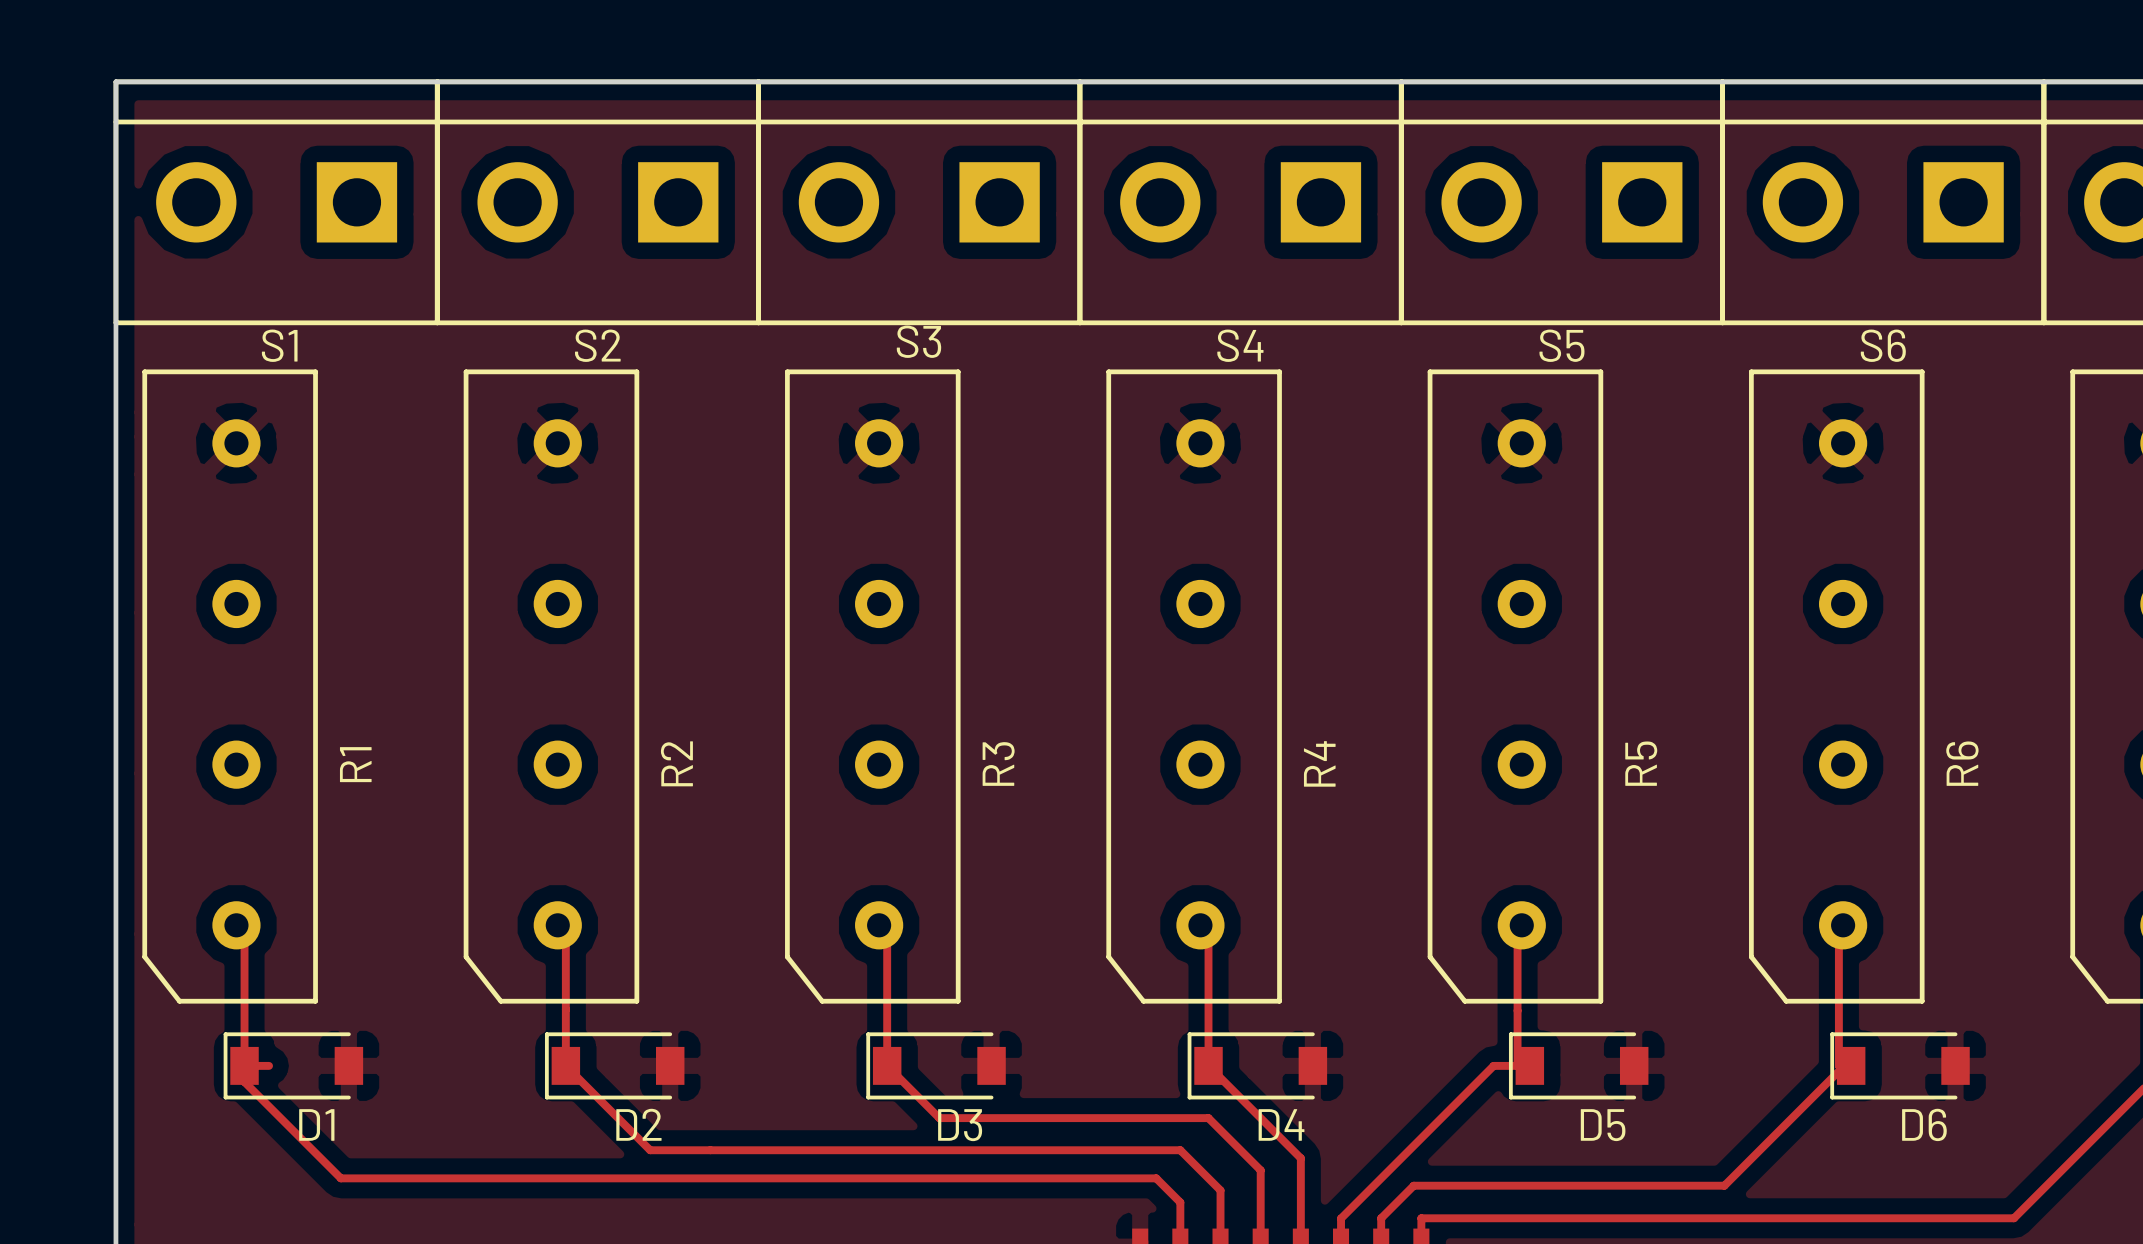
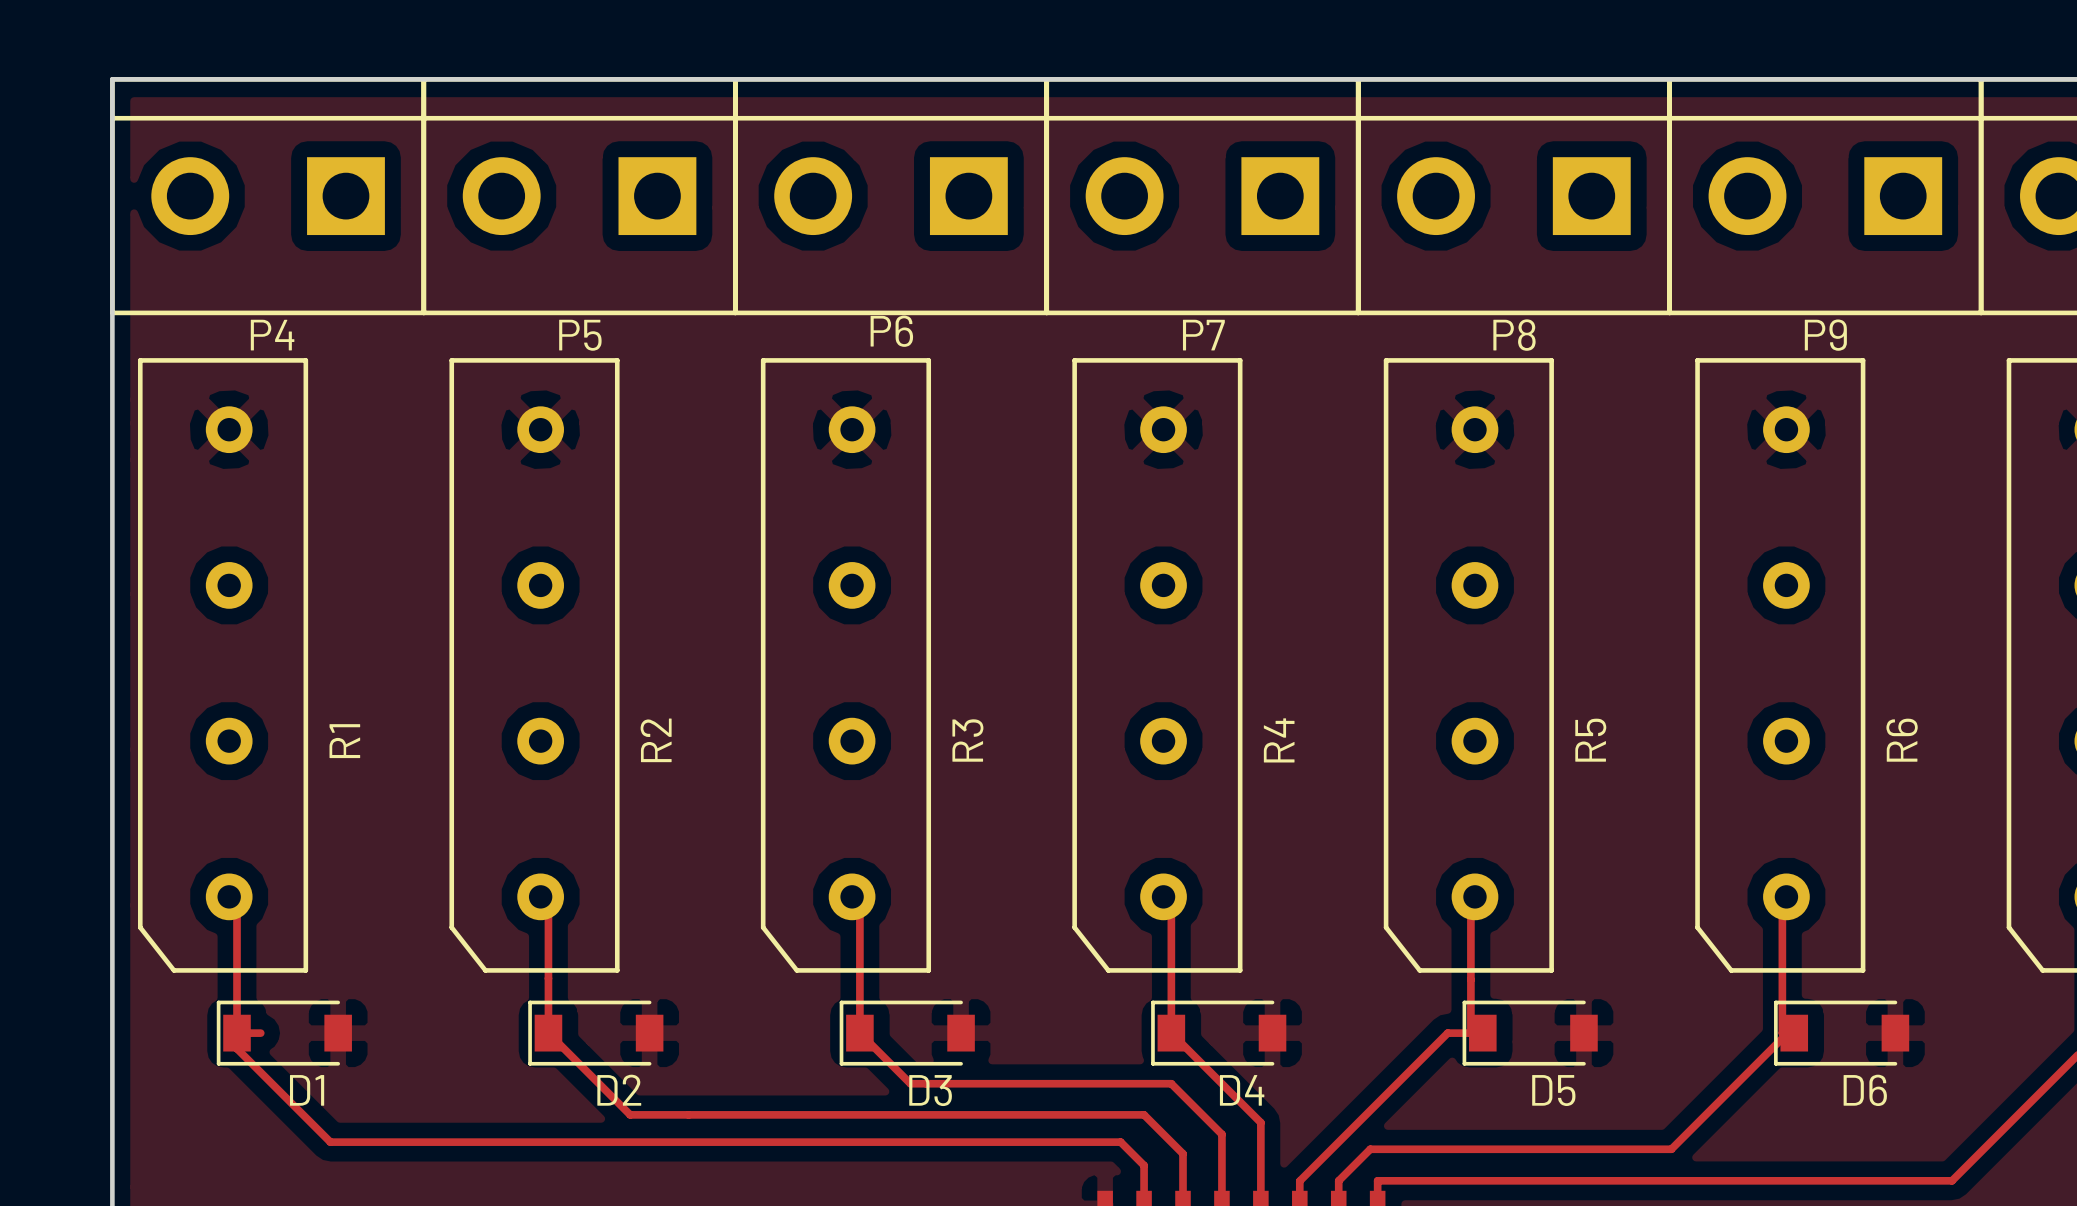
S3 name: S3 (918, 341) -> P6 (891, 331)
S1 name: S1 (279, 345) -> P4 (272, 335)
S2 name: S2 (597, 345) -> P5 (580, 335)
S4 name: S4 (1240, 345) -> P7 (1203, 335)
S5 name: S5 (1561, 345) -> P8 (1514, 335)
S6 name: S6 (1883, 345) -> P9 (1825, 335)

